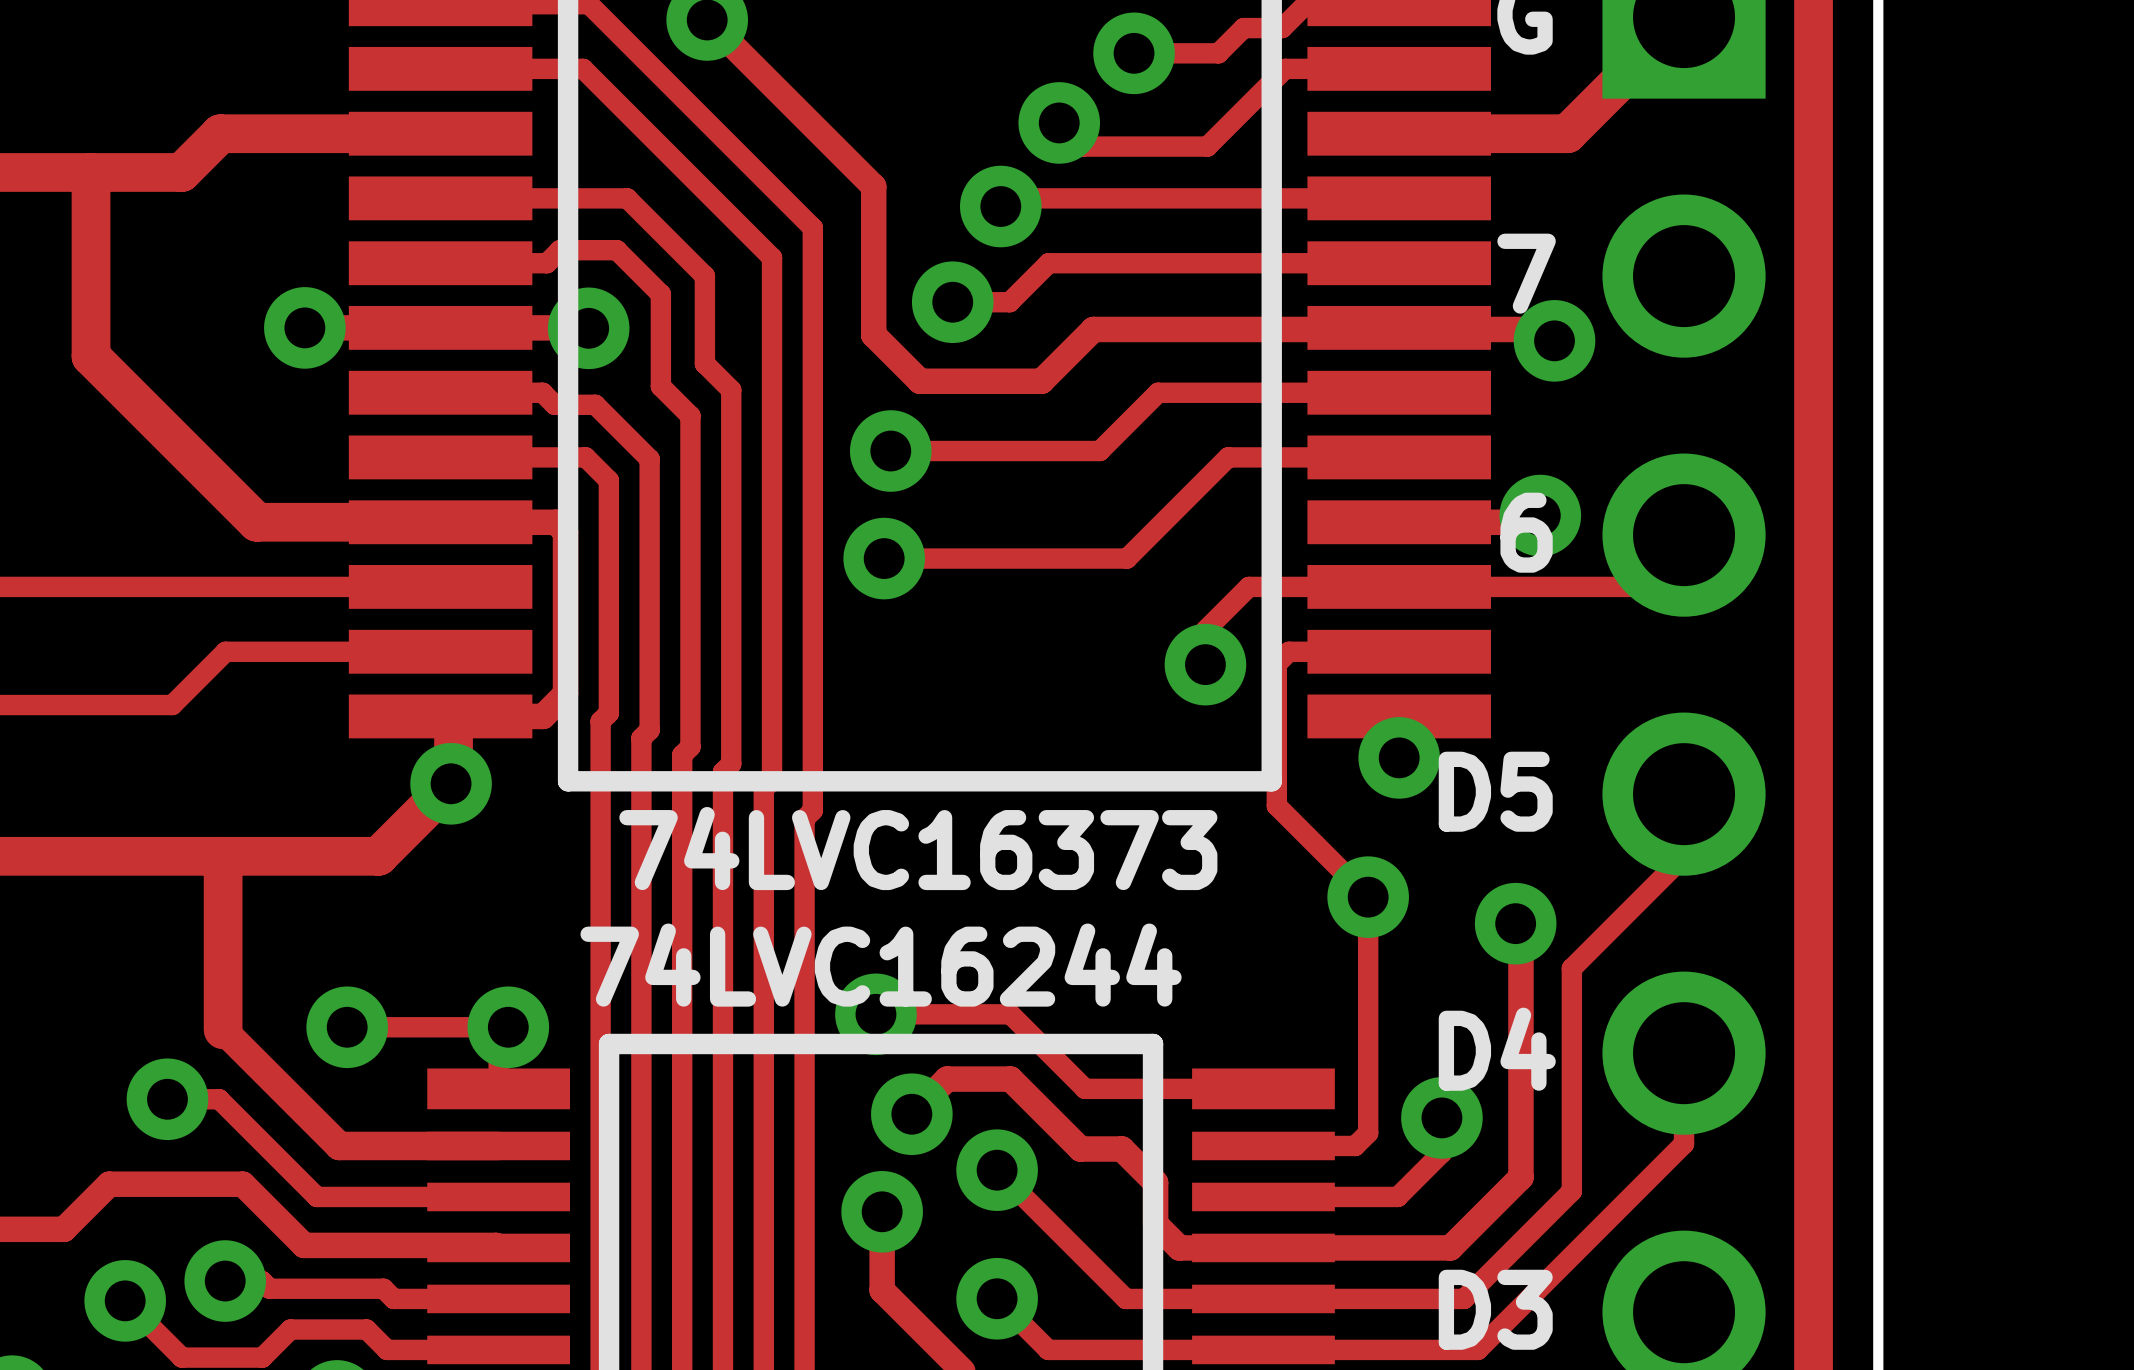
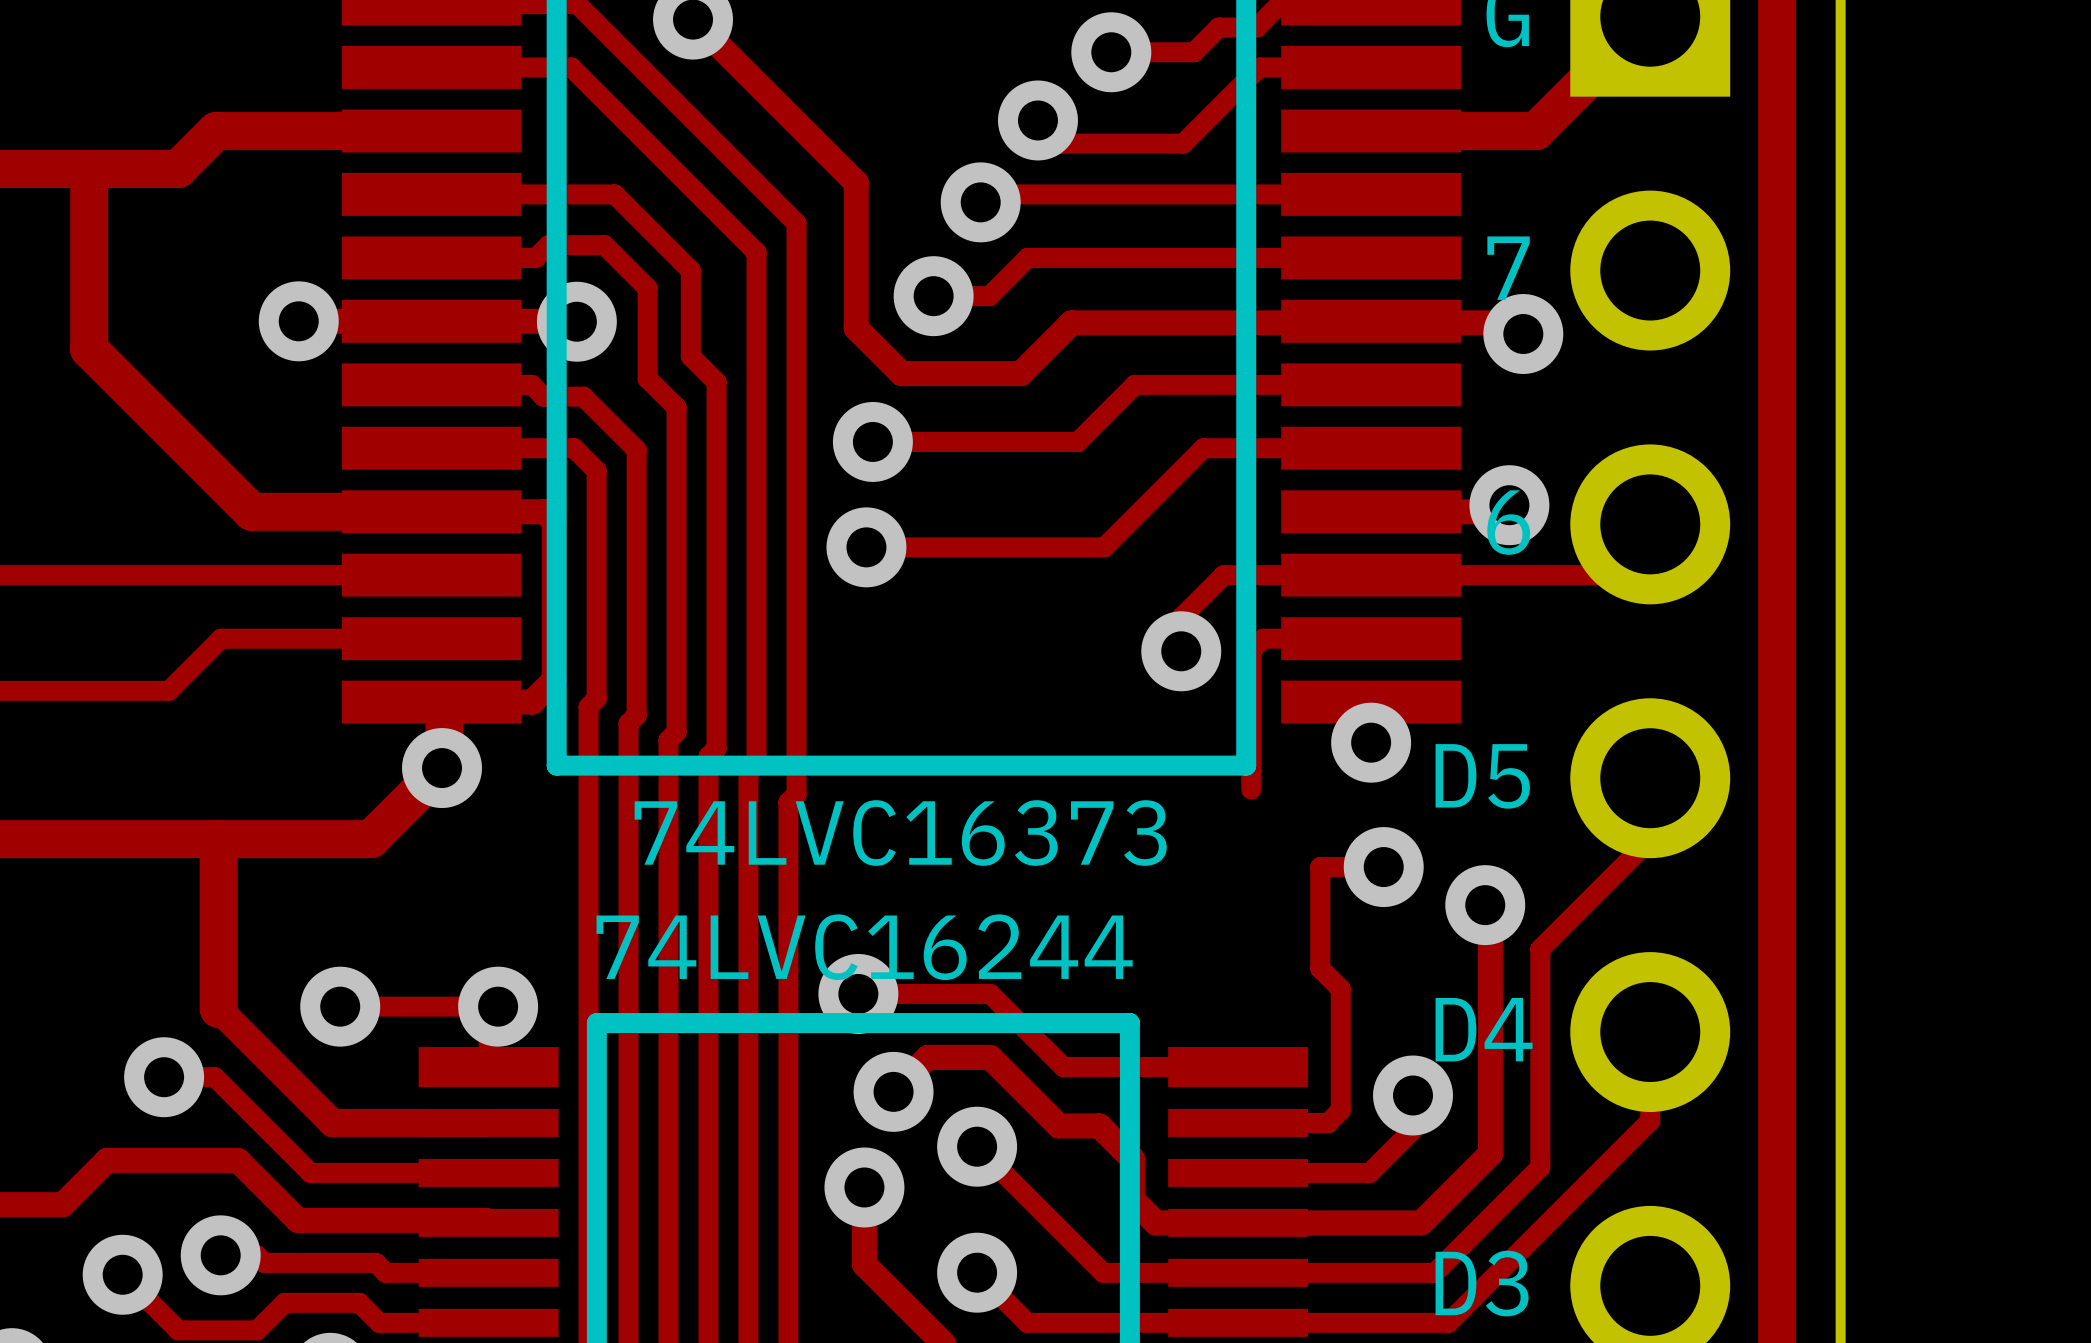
track: (1276, 805) (1368, 897) (1368, 1009) -> (1383, 867) (1320, 867) (1320, 968) (1340, 989)
via position: (1368, 897) -> (1383, 867)

